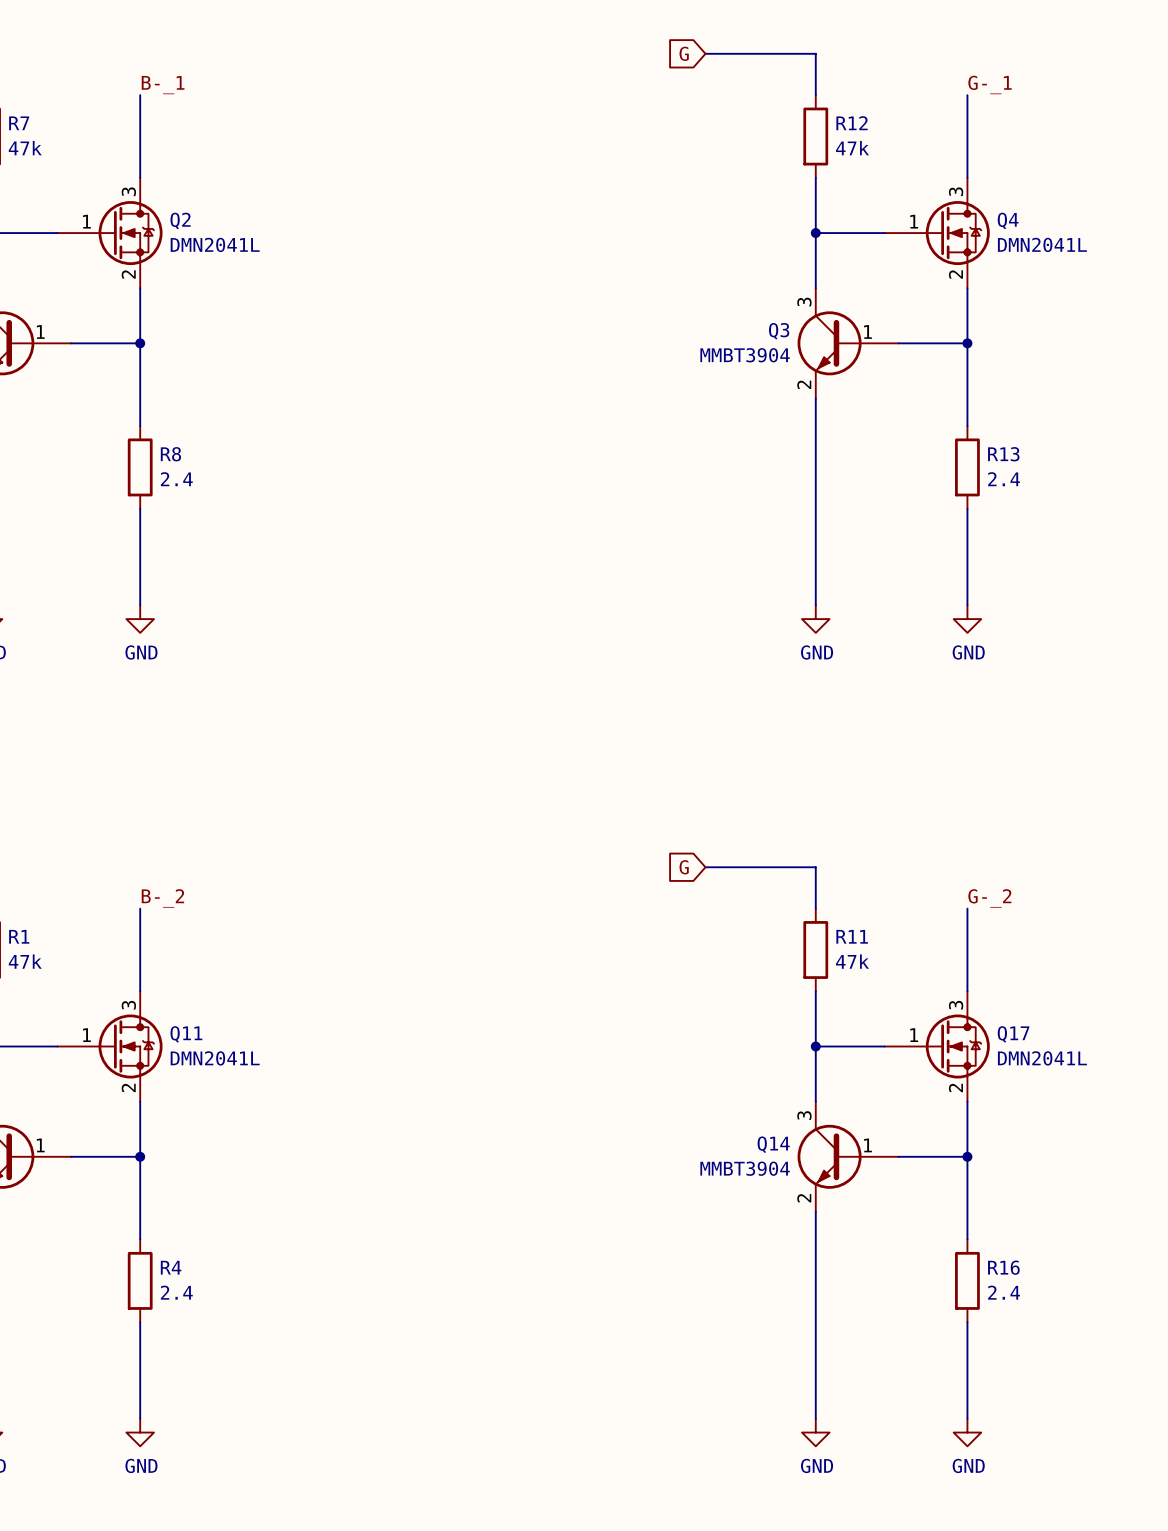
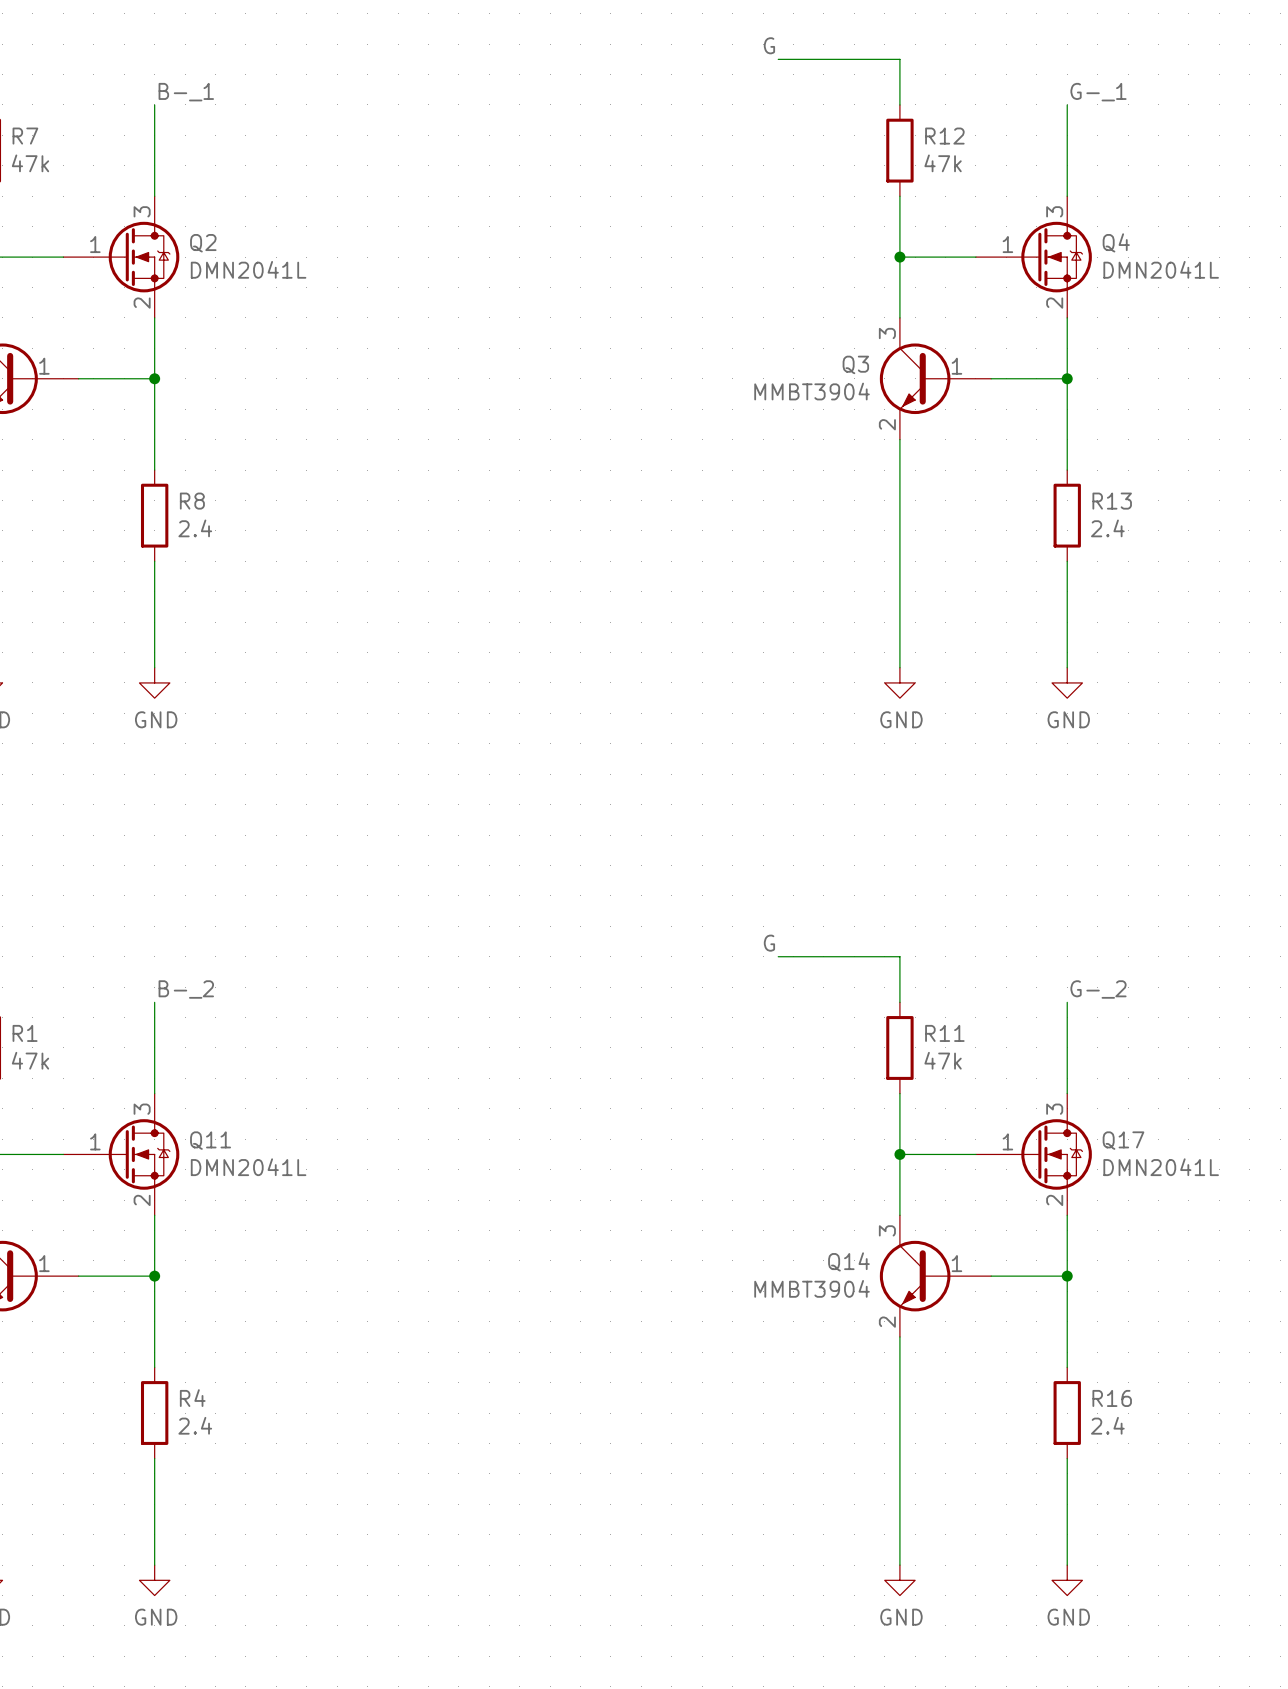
label: none -> G (769, 45)
global label: G (684, 53) -> none
label: none -> G (769, 943)
global label: G (684, 867) -> none

